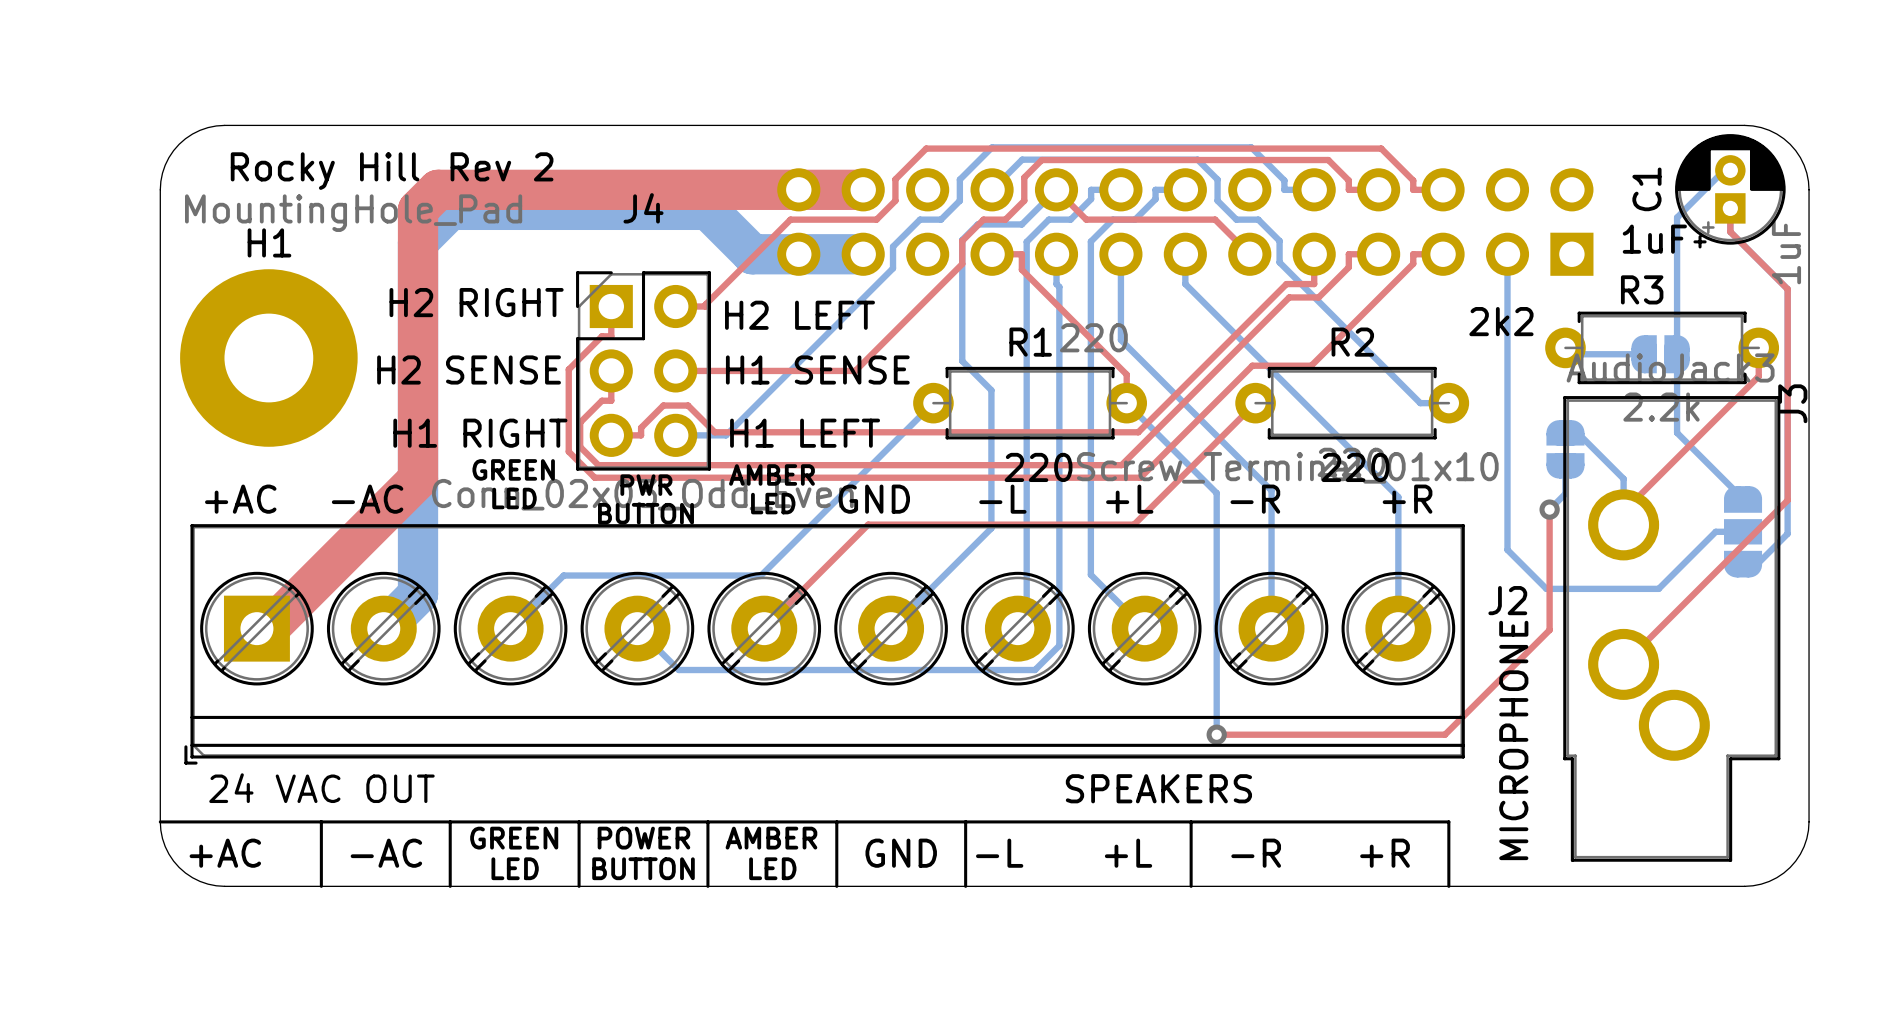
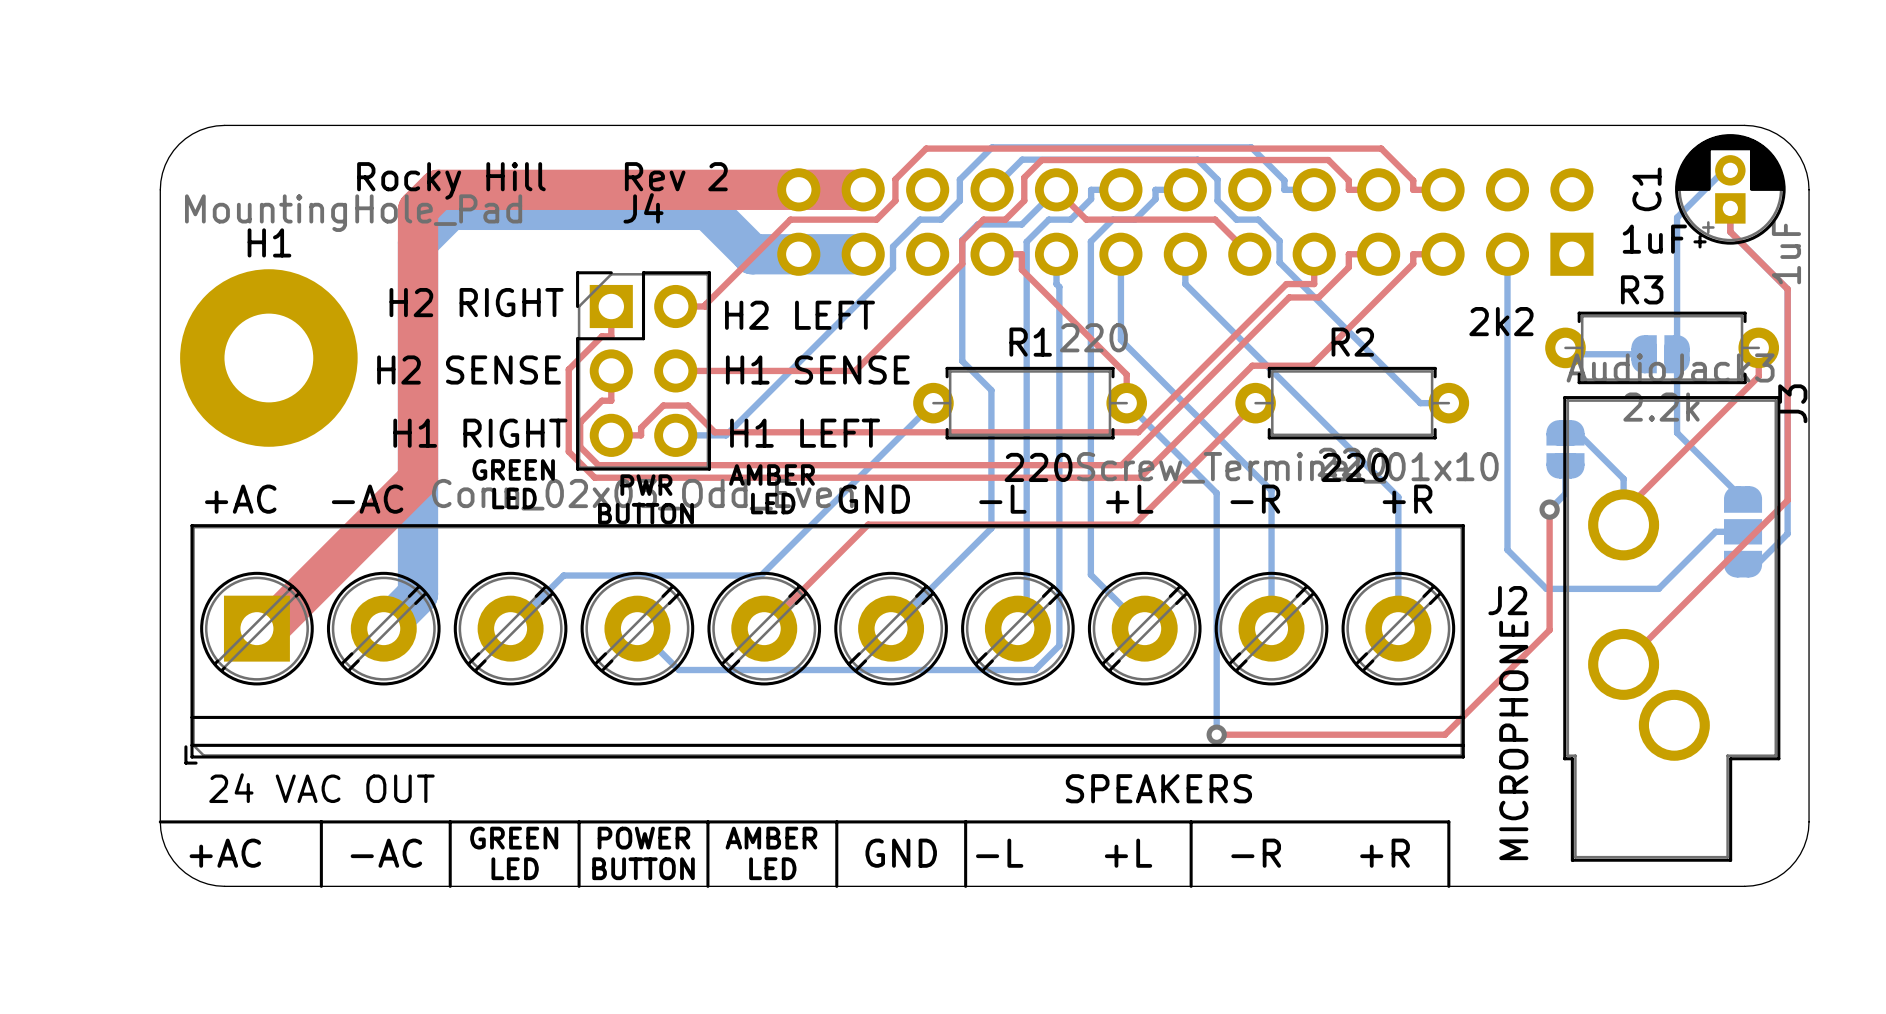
text position: Rev 2 (502, 166) -> Rev 2 (676, 176)
text position: Rocky Hill (325, 171) -> Rocky Hill (451, 180)

